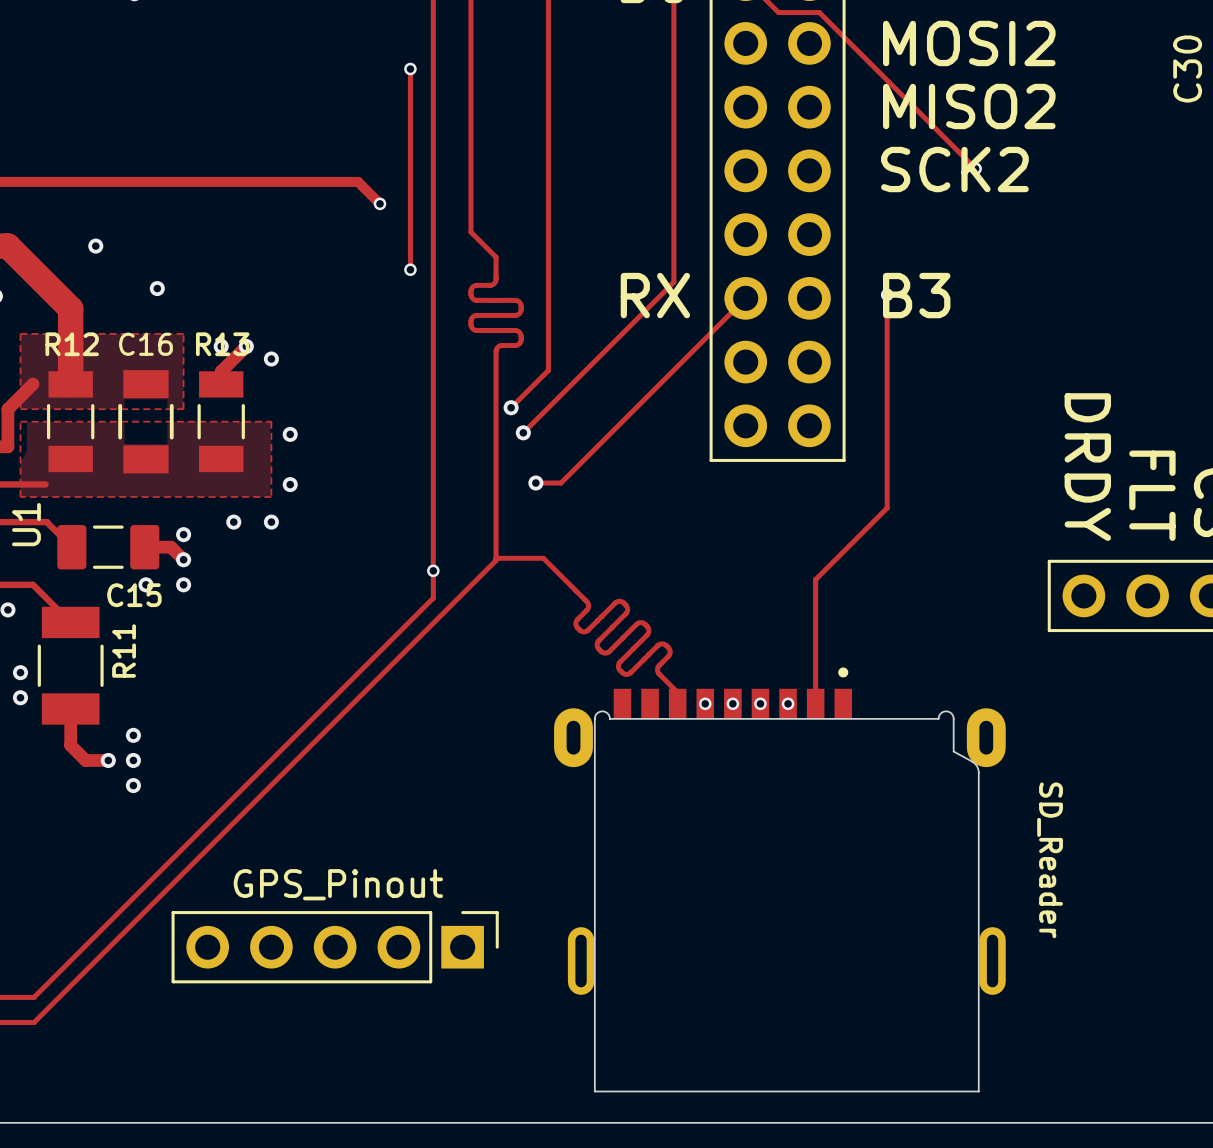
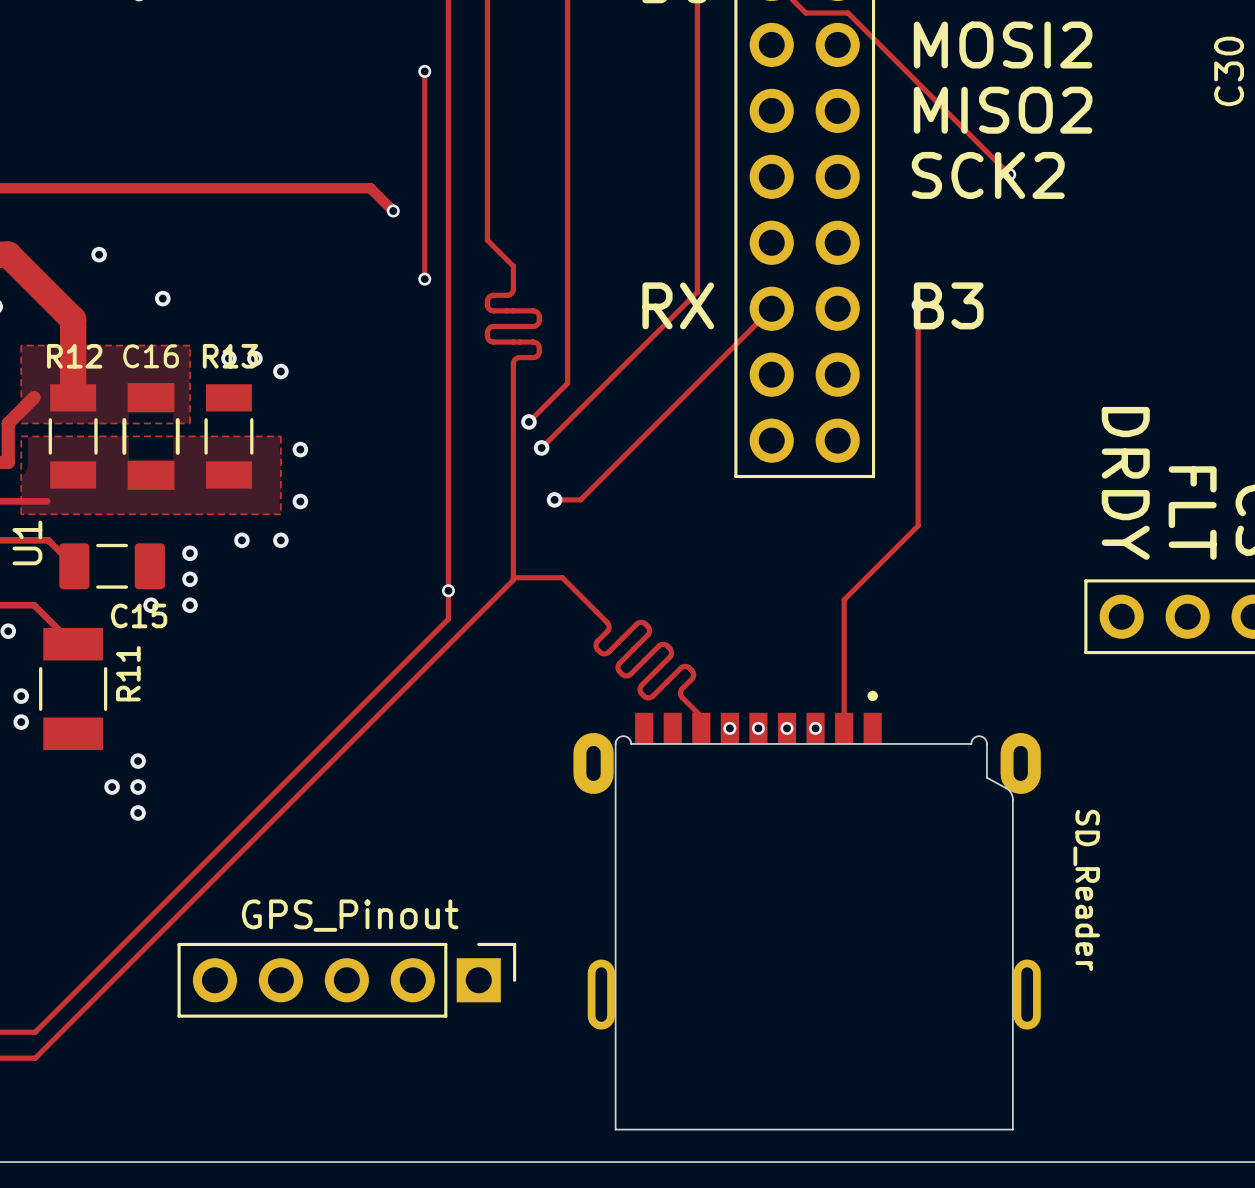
track: (246, 346) (221, 371) (221, 384) -> none
track: (144, 547) (171, 547) (183, 559) -> none
track: (70, 709) (70, 745) (85, 760) (108, 760) -> none

